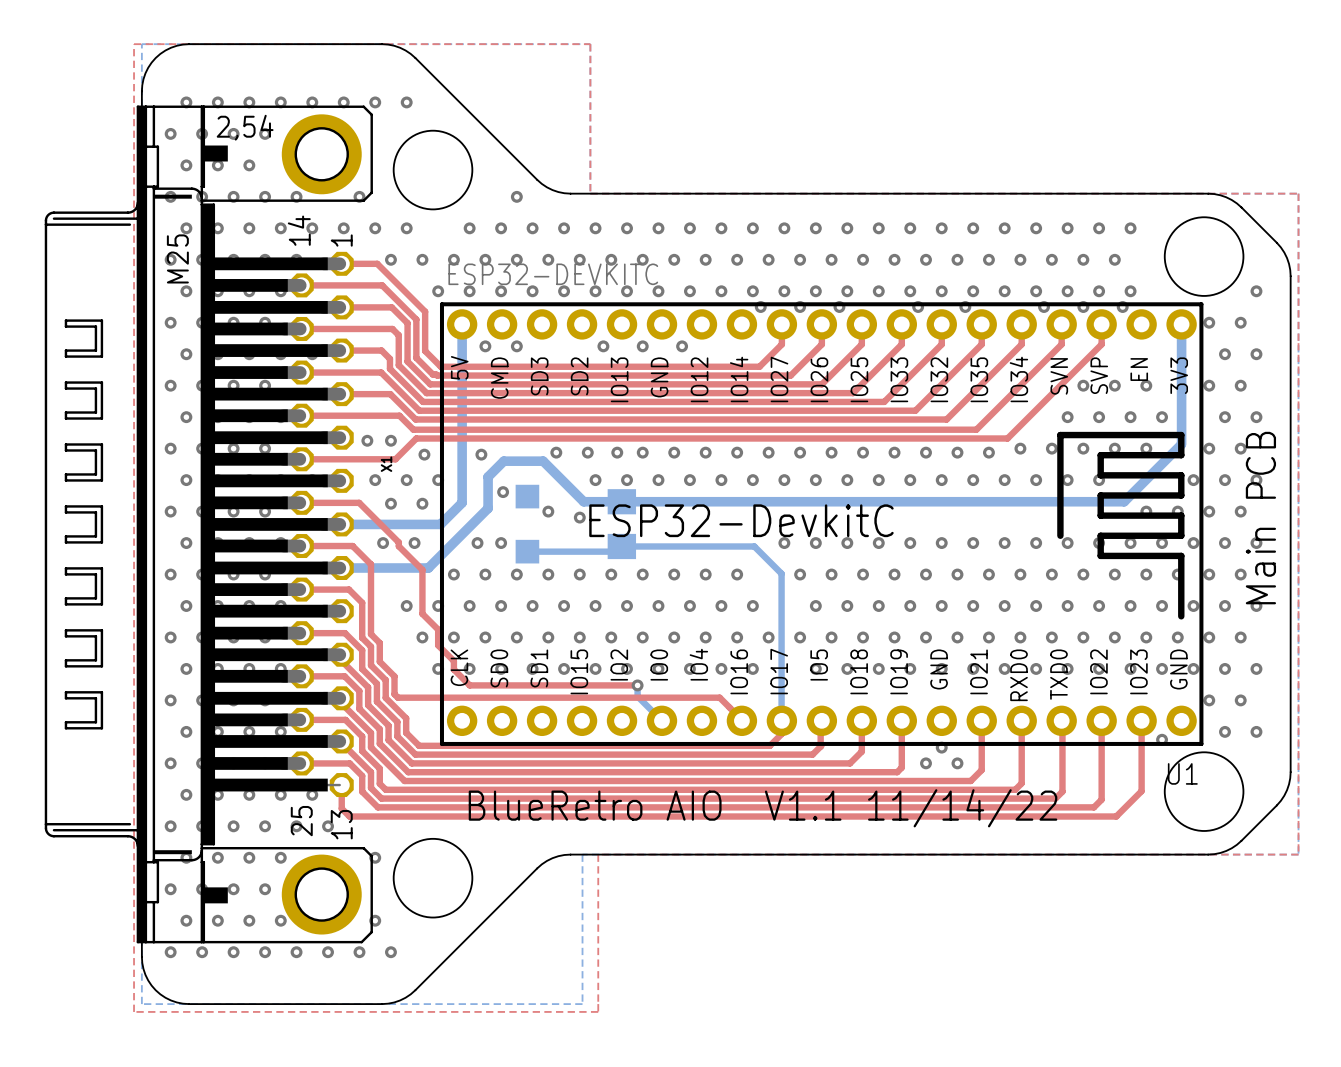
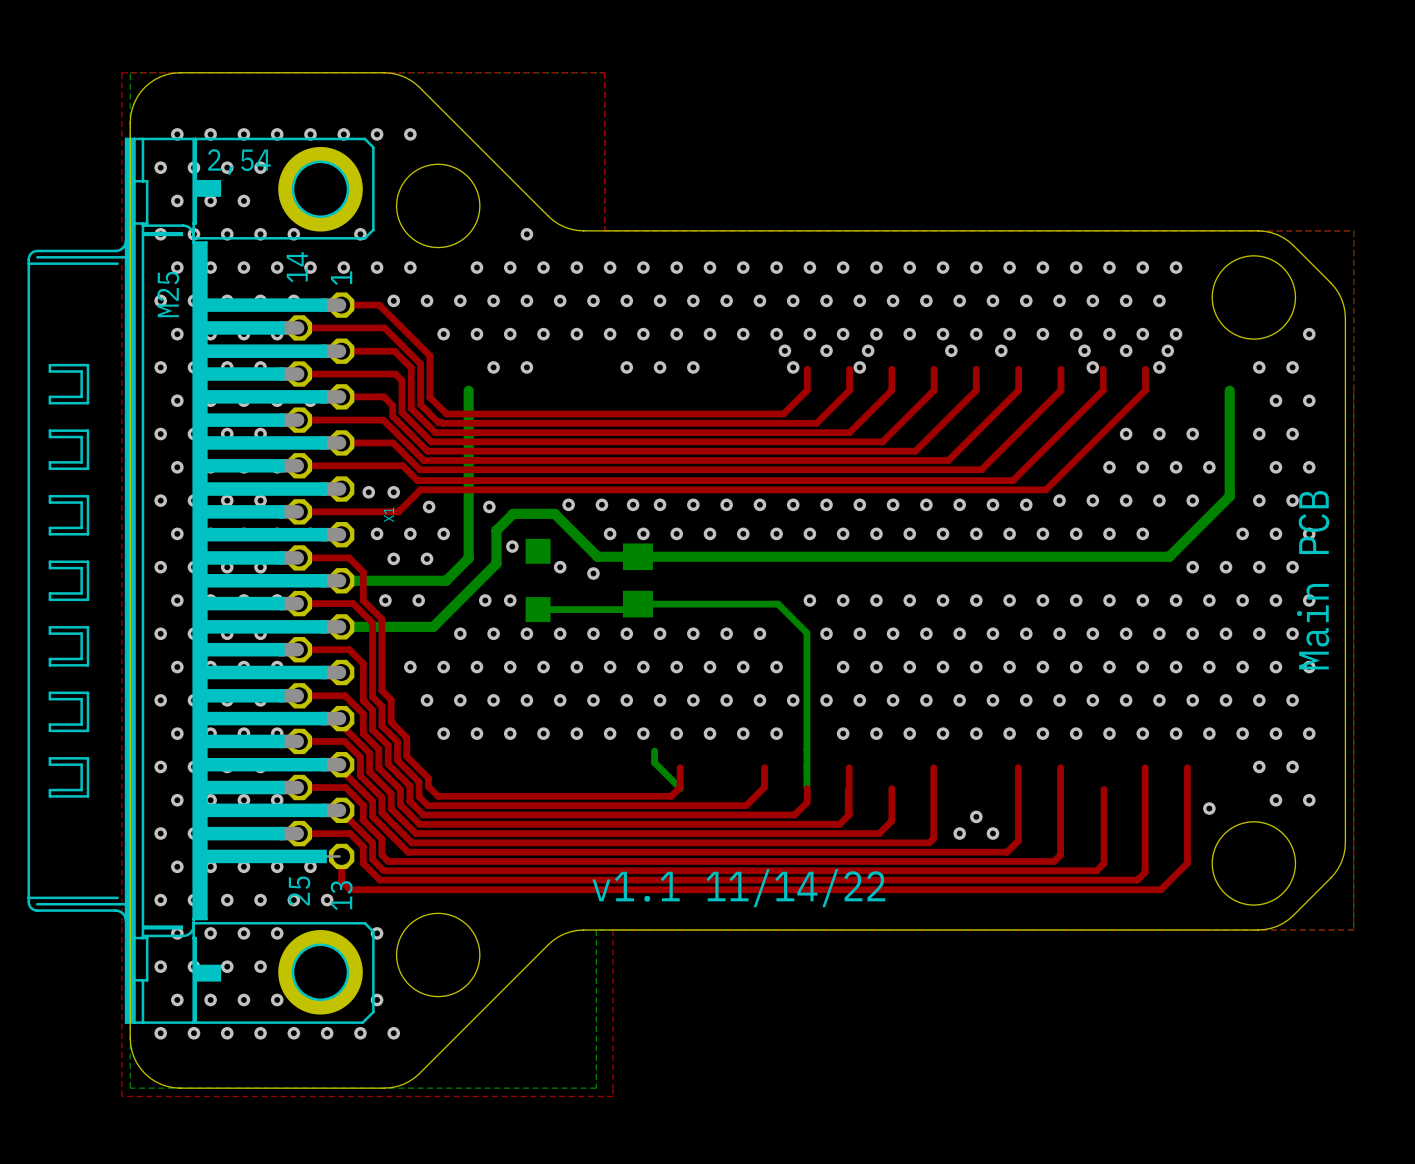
via: none -> (493, 367)
via: none -> (526, 367)
via: none -> (626, 367)
via: none -> (660, 367)
via: none -> (693, 367)
via: none -> (793, 367)
via: none -> (859, 367)
via: none -> (1092, 367)
via: none -> (1159, 367)
bottom track: (462, 324) (461, 503) -> (468, 390) (468, 558)
bottom track: (1181, 324) (1181, 444) -> (1229, 390) (1229, 496)
via: (485, 346) -> none
via: (516, 346) -> none
via: (603, 346) -> none
via: (642, 346) -> none
via: (682, 346) -> none
top track: (348, 502) (359, 502) (398, 542) (398, 546) (422, 569) (422, 613) (438, 629) (438, 645) (453, 661) (453, 669) (469, 685) (637, 685) -> (349, 557) (363, 572) (363, 600) (381, 619) (381, 690) (391, 699) (391, 722) (406, 737) (406, 756) (428, 778) (428, 786) (438, 796) (671, 796) (680, 787) (680, 767)
U1: (821, 524) -> none
via: (637, 685) -> none
top track: (397, 697) (719, 697) (741, 719) -> (401, 764) (419, 782) (419, 796) (427, 805) (746, 805) (764, 787) (764, 767)
top track: none -> (849, 767) (849, 814)
top track: (901, 720) (901, 767) -> (933, 767) (933, 838)
top track: (981, 720) (981, 770) -> (1018, 767) (1018, 840)
top track: (1021, 720) (1021, 783) -> (1060, 767) (1060, 854)
top track: (1101, 720) (1101, 799) -> (1145, 767) (1145, 872)
top track: (1141, 720) (1141, 791) -> (1187, 767) (1187, 863)
text: BlueRetro AIO V1.1 11/14/22 (763, 808) -> none
text: none -> v1.1 11/14/22 (738, 888)

